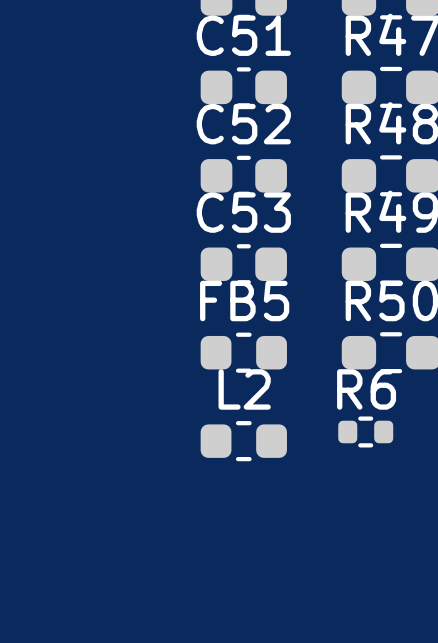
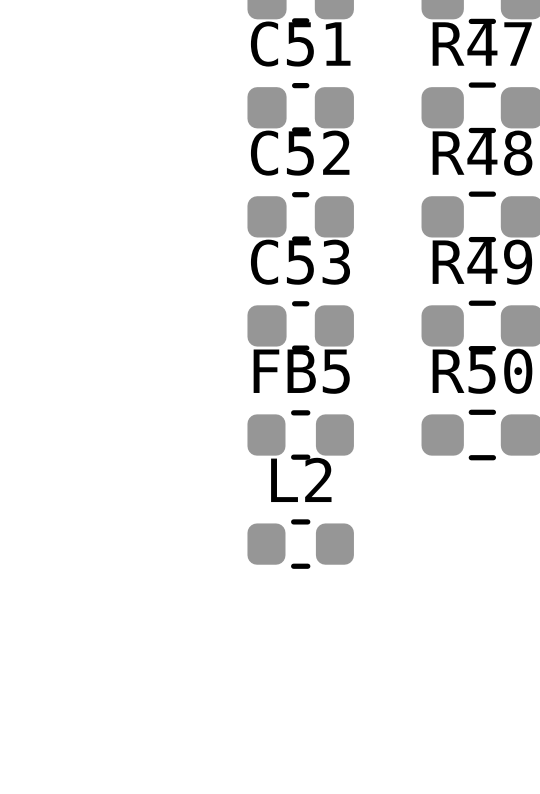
R6: (365, 431) -> none

